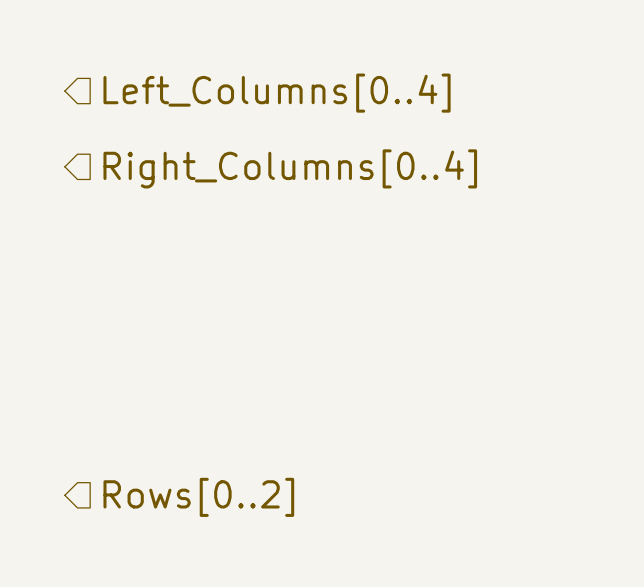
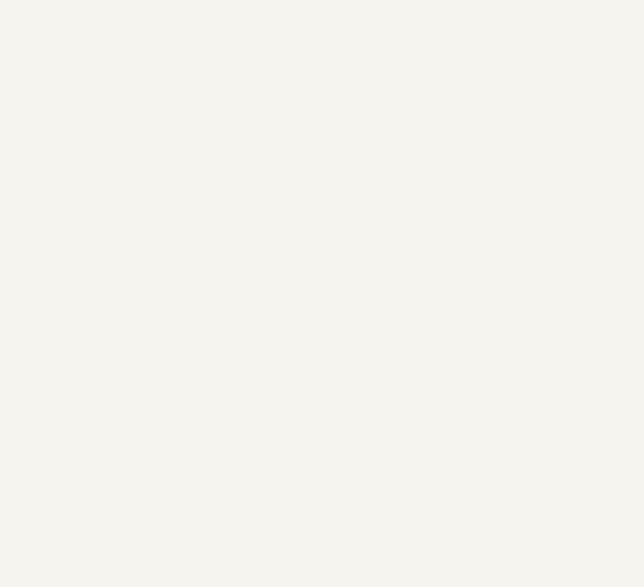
hierarchical label: Left_Columns[0..4] (277, 93) -> none
hierarchical label: Right_Columns[0..4] (290, 168) -> none
hierarchical label: Rows[0..2] (198, 497) -> none

